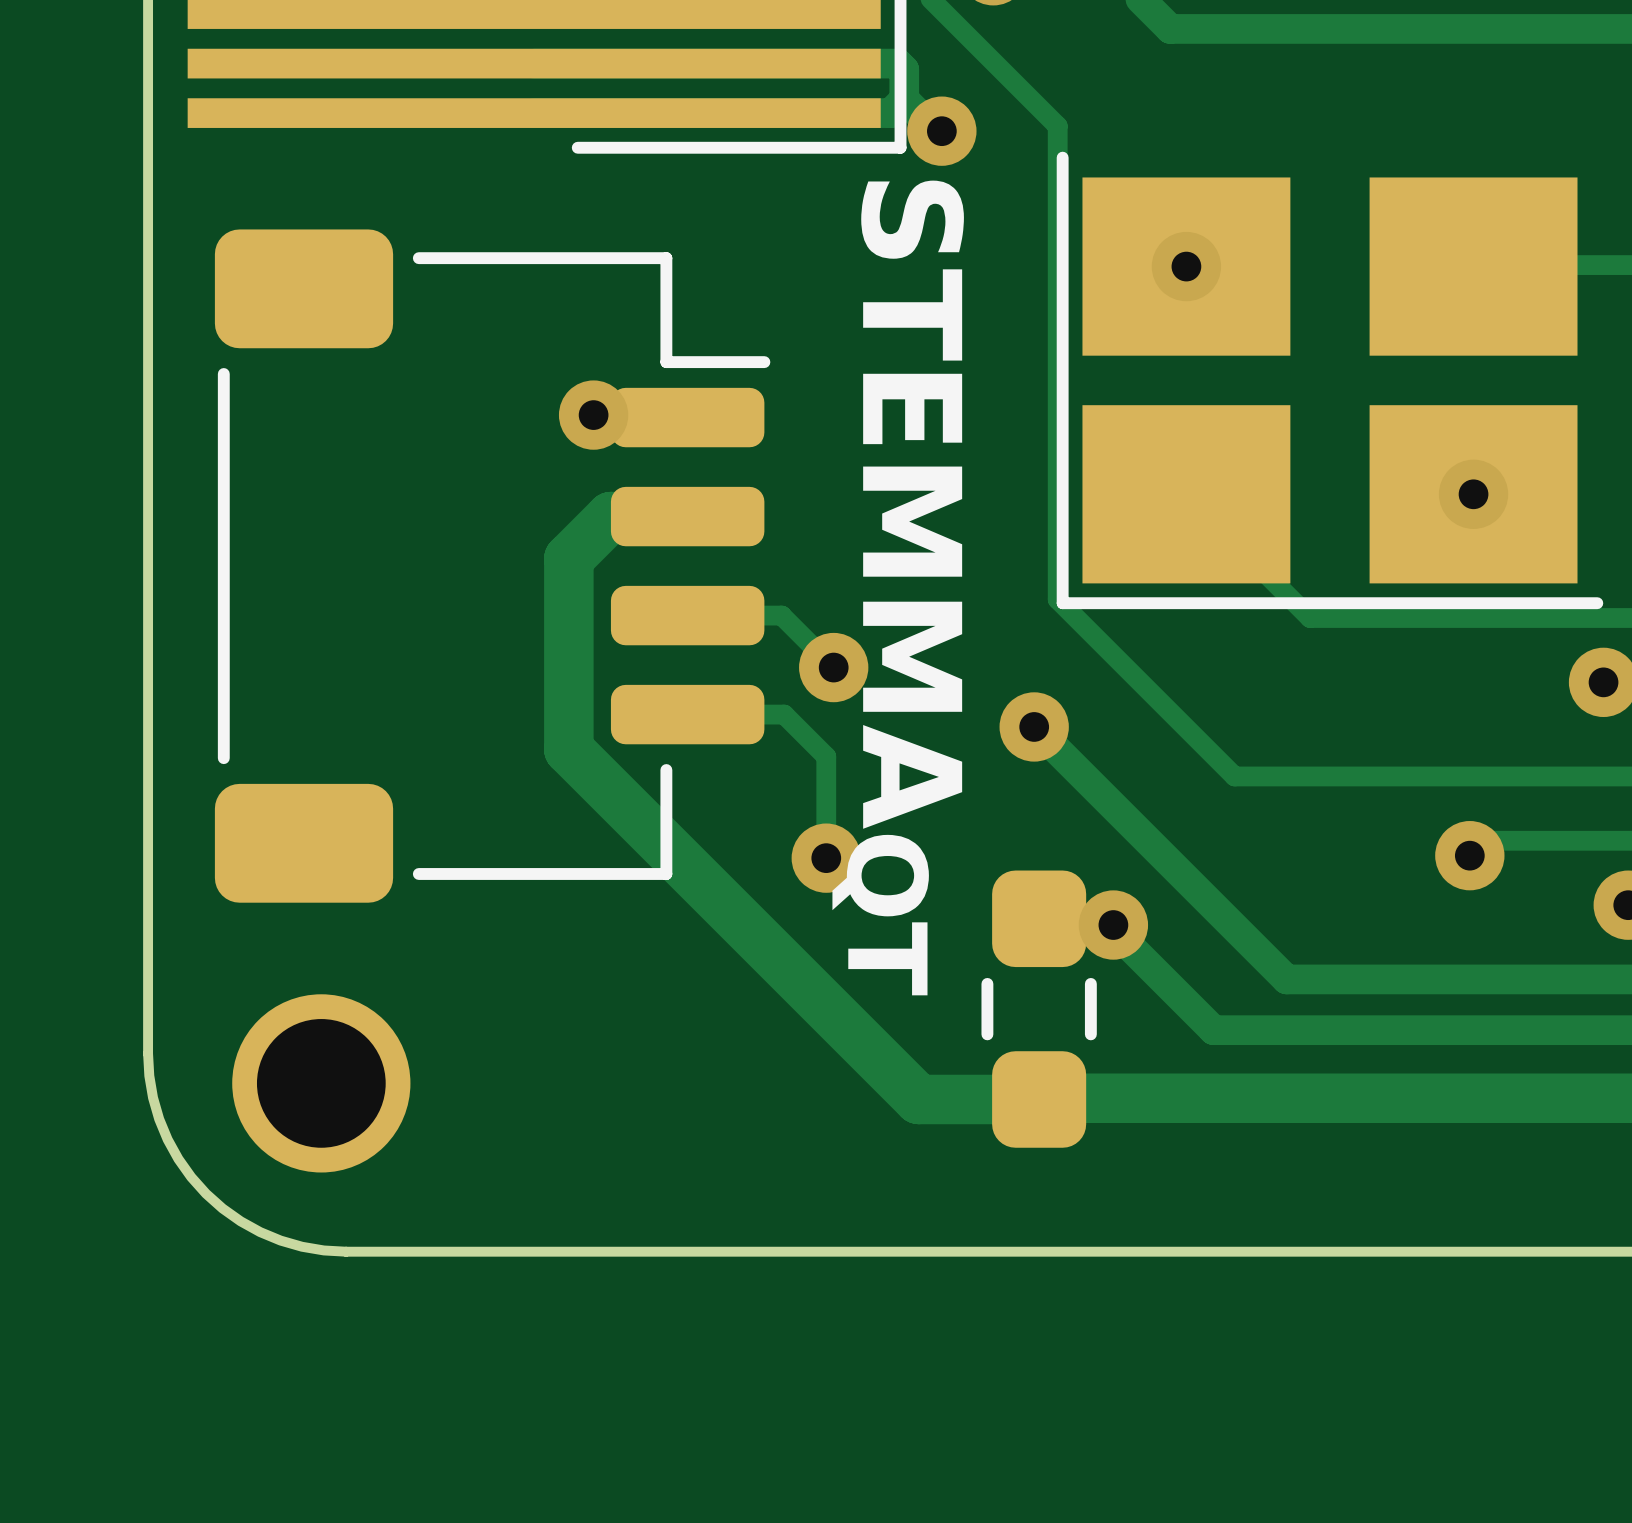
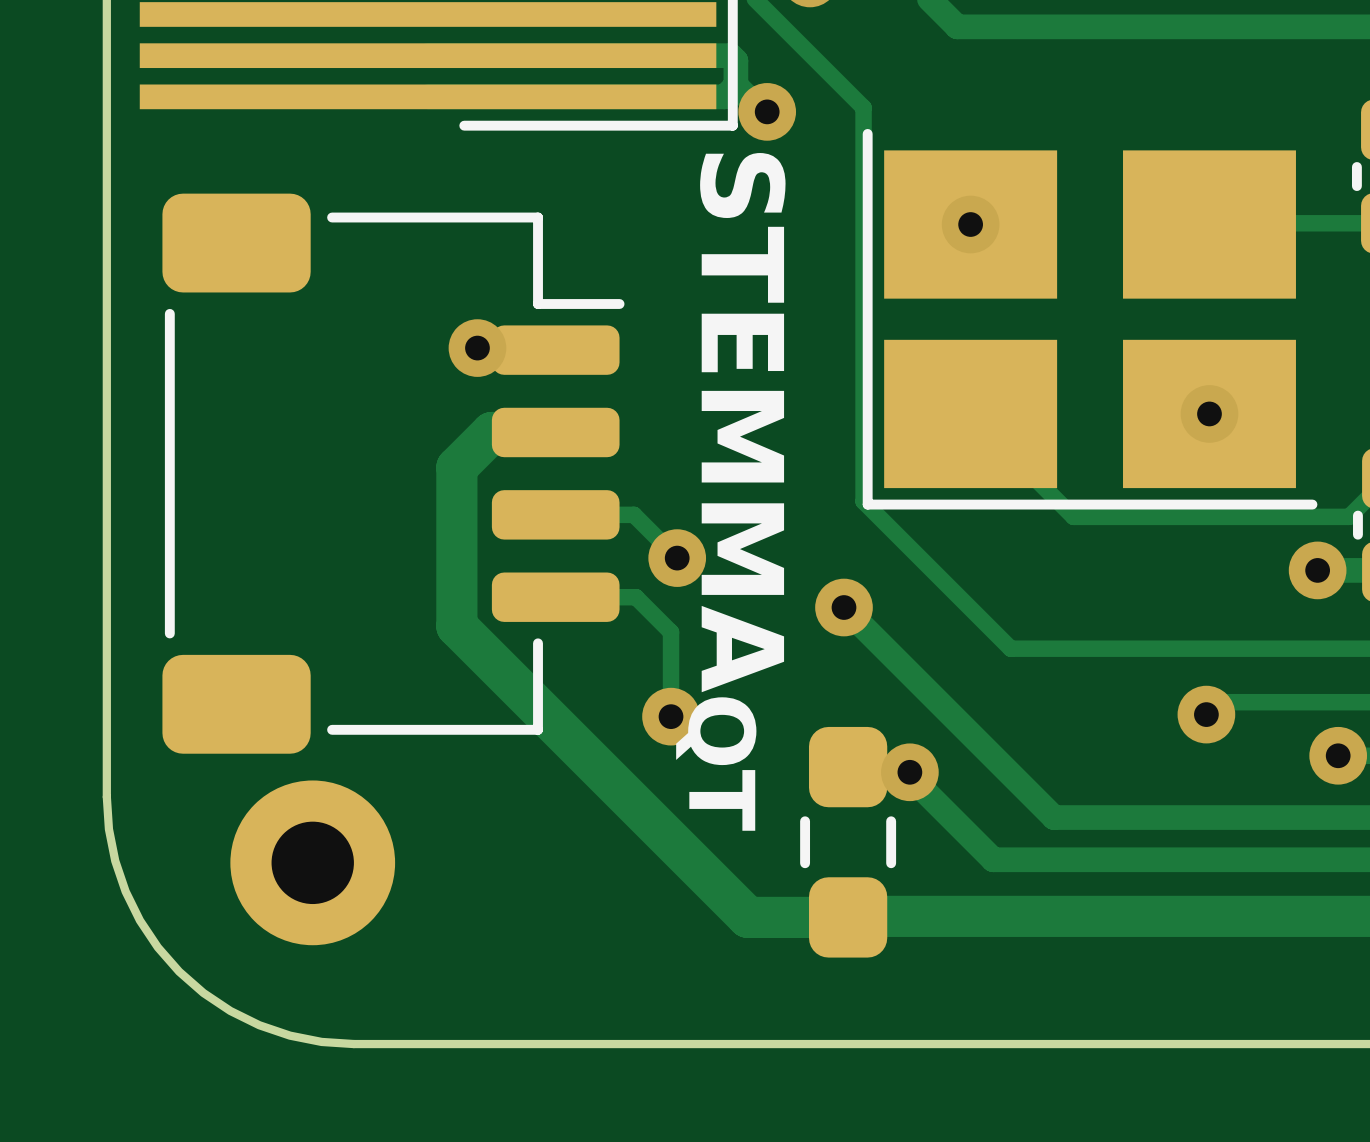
board edge: (148, 954) (148, 1053) (153, 1097) (167, 1139) (191, 1177) (206, 1193) (222, 1208) (260, 1232) (302, 1246) (346, 1251) (445, 1251) -> (106, 796) (108, 829) (115, 860) (125, 891) (139, 920) (157, 947) (179, 971) (203, 992) (230, 1010) (259, 1025) (289, 1035) (321, 1041) (353, 1044)
part footprint: [232, 994, 411, 1173] -> [230, 780, 396, 946]

